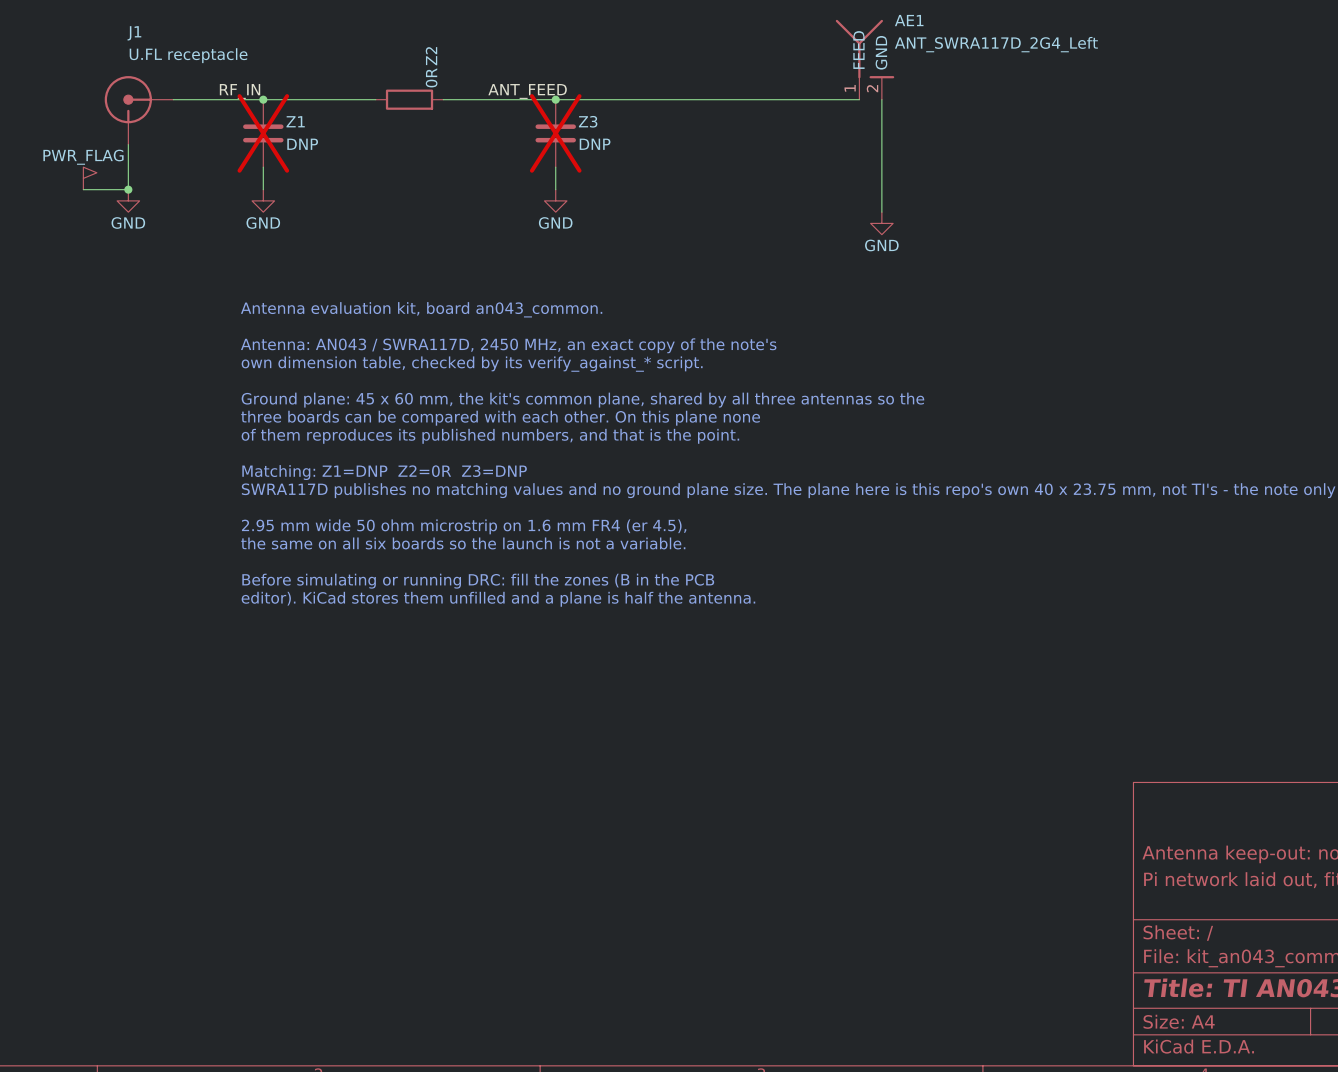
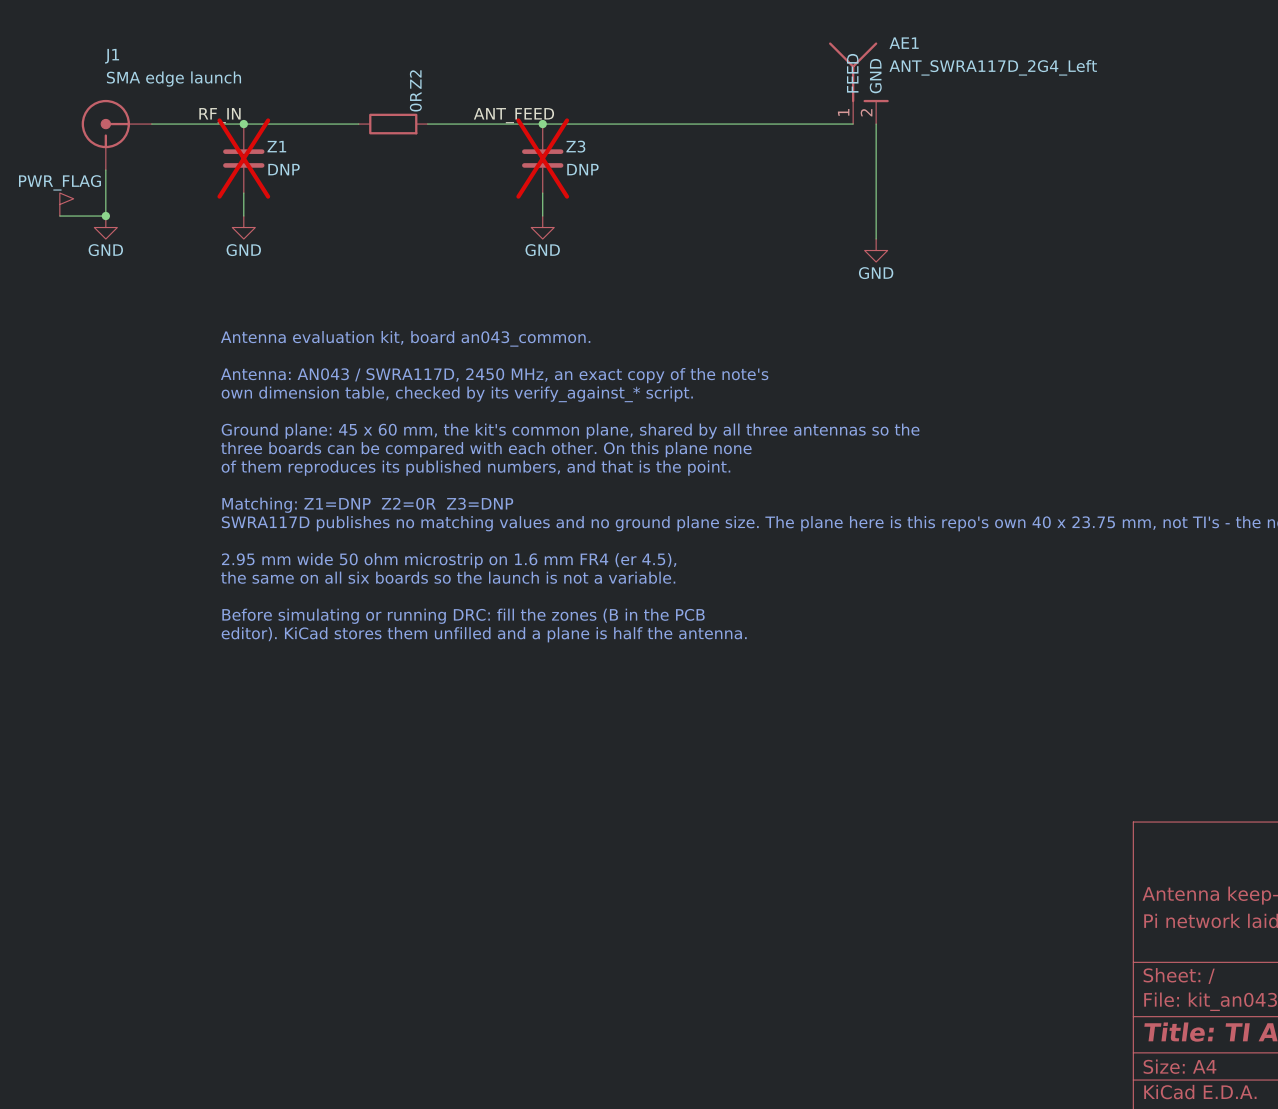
J1 value: U.FL receptacle (188, 55) -> SMA edge launch (173, 79)

